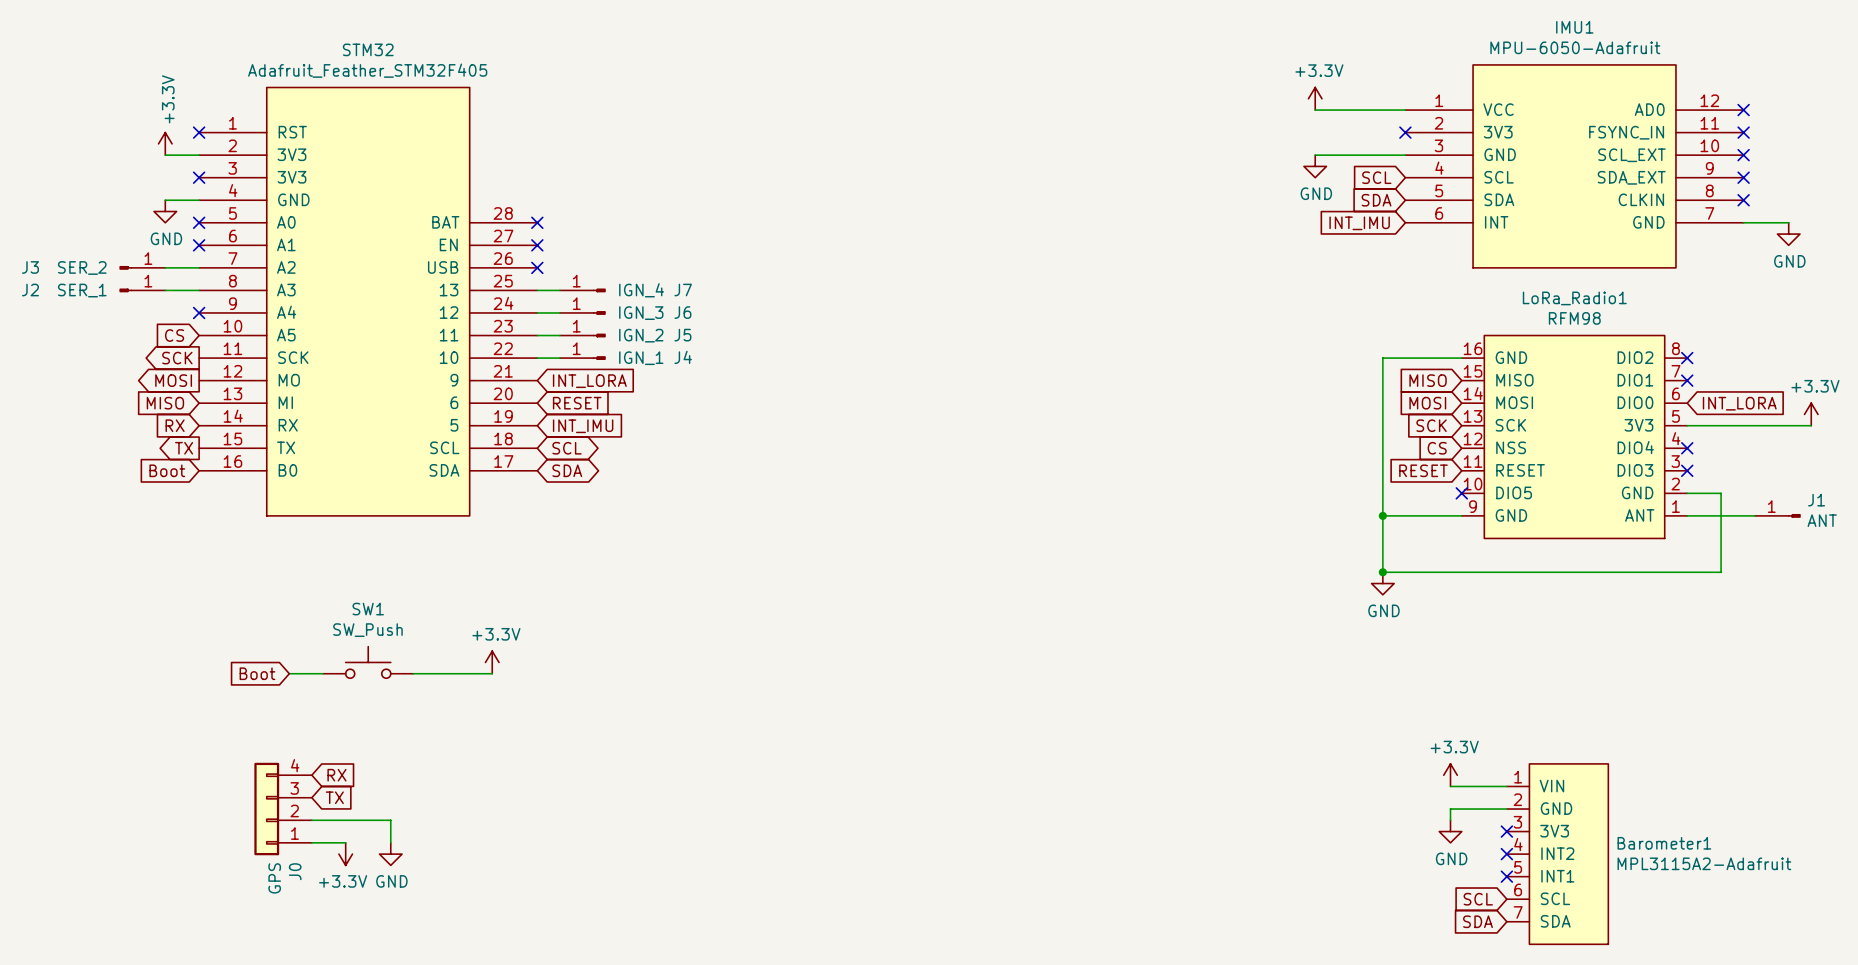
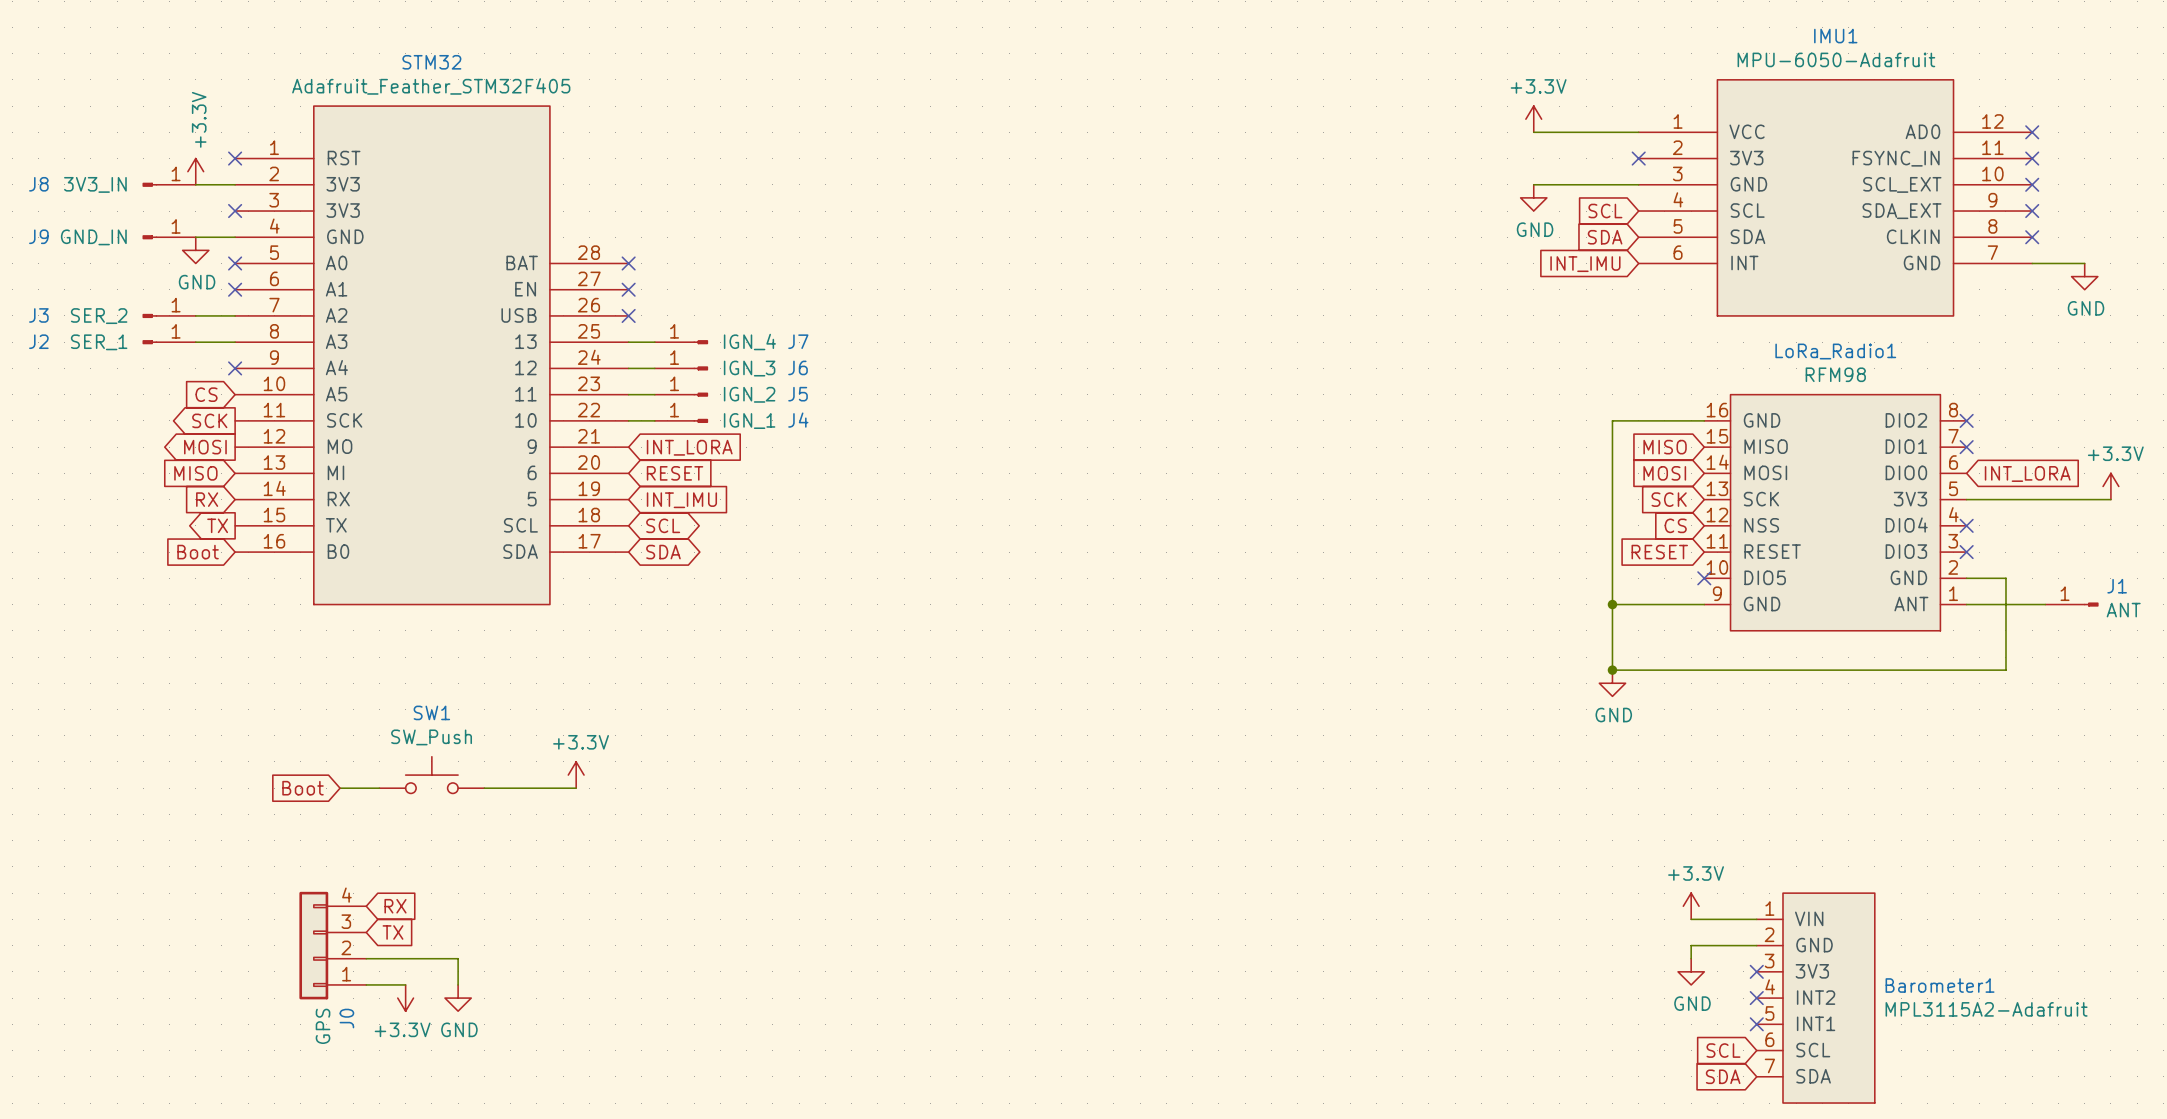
J8: none -> 3V3_IN (169, 184)
J9: none -> GND_IN (169, 237)

